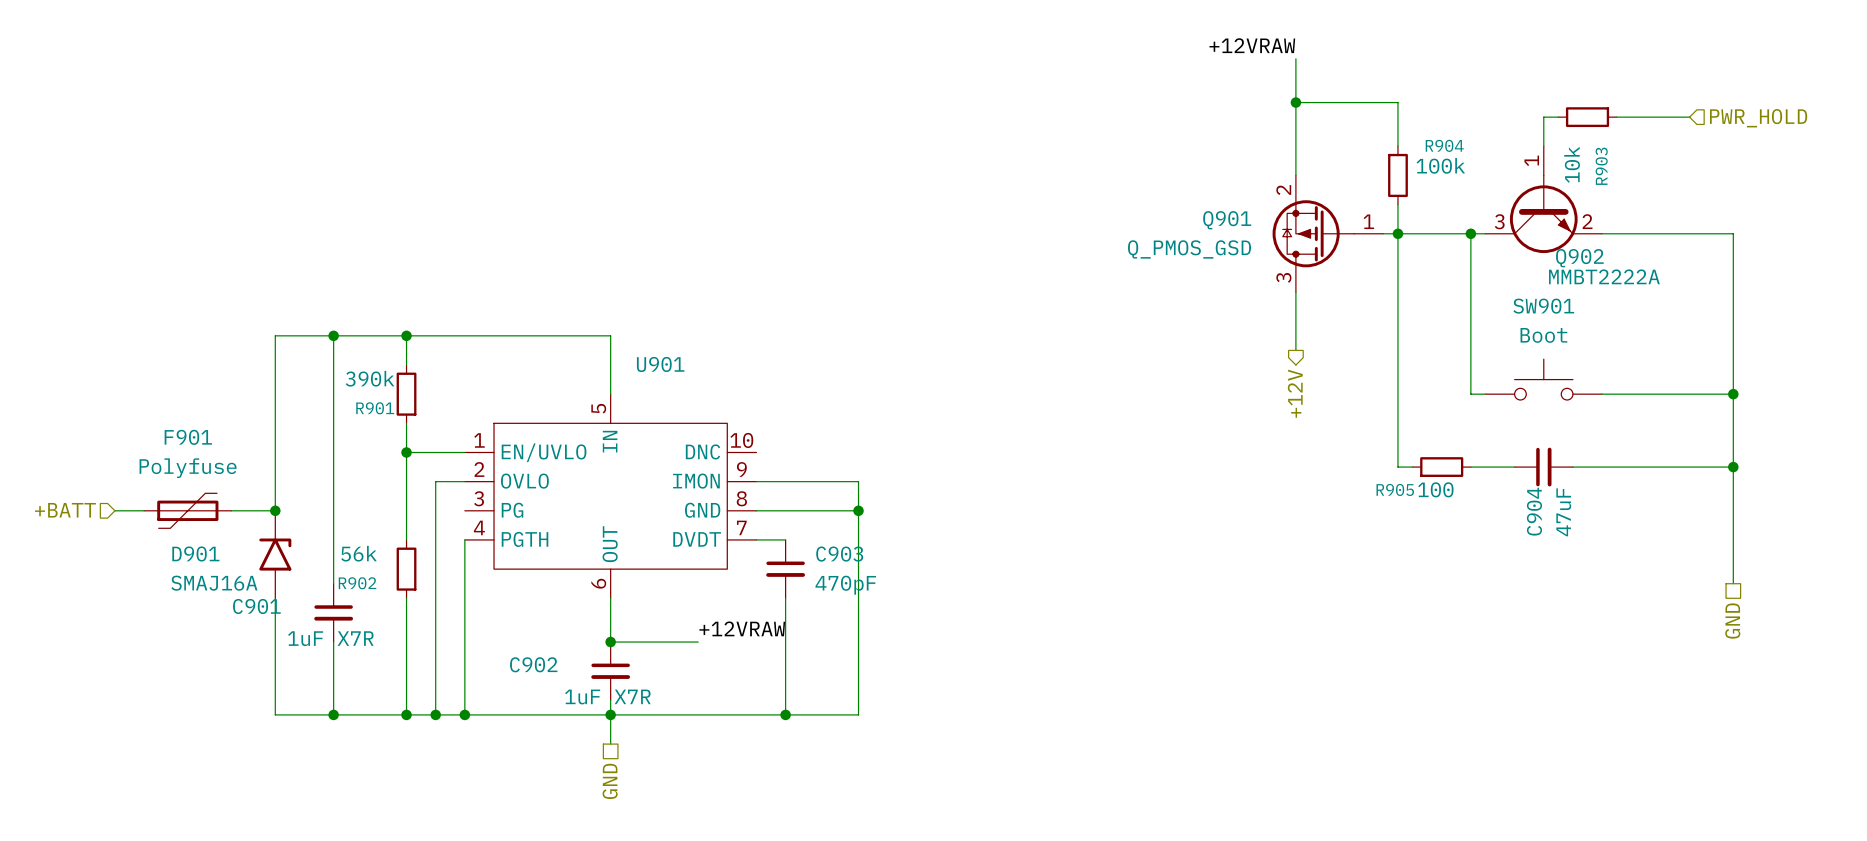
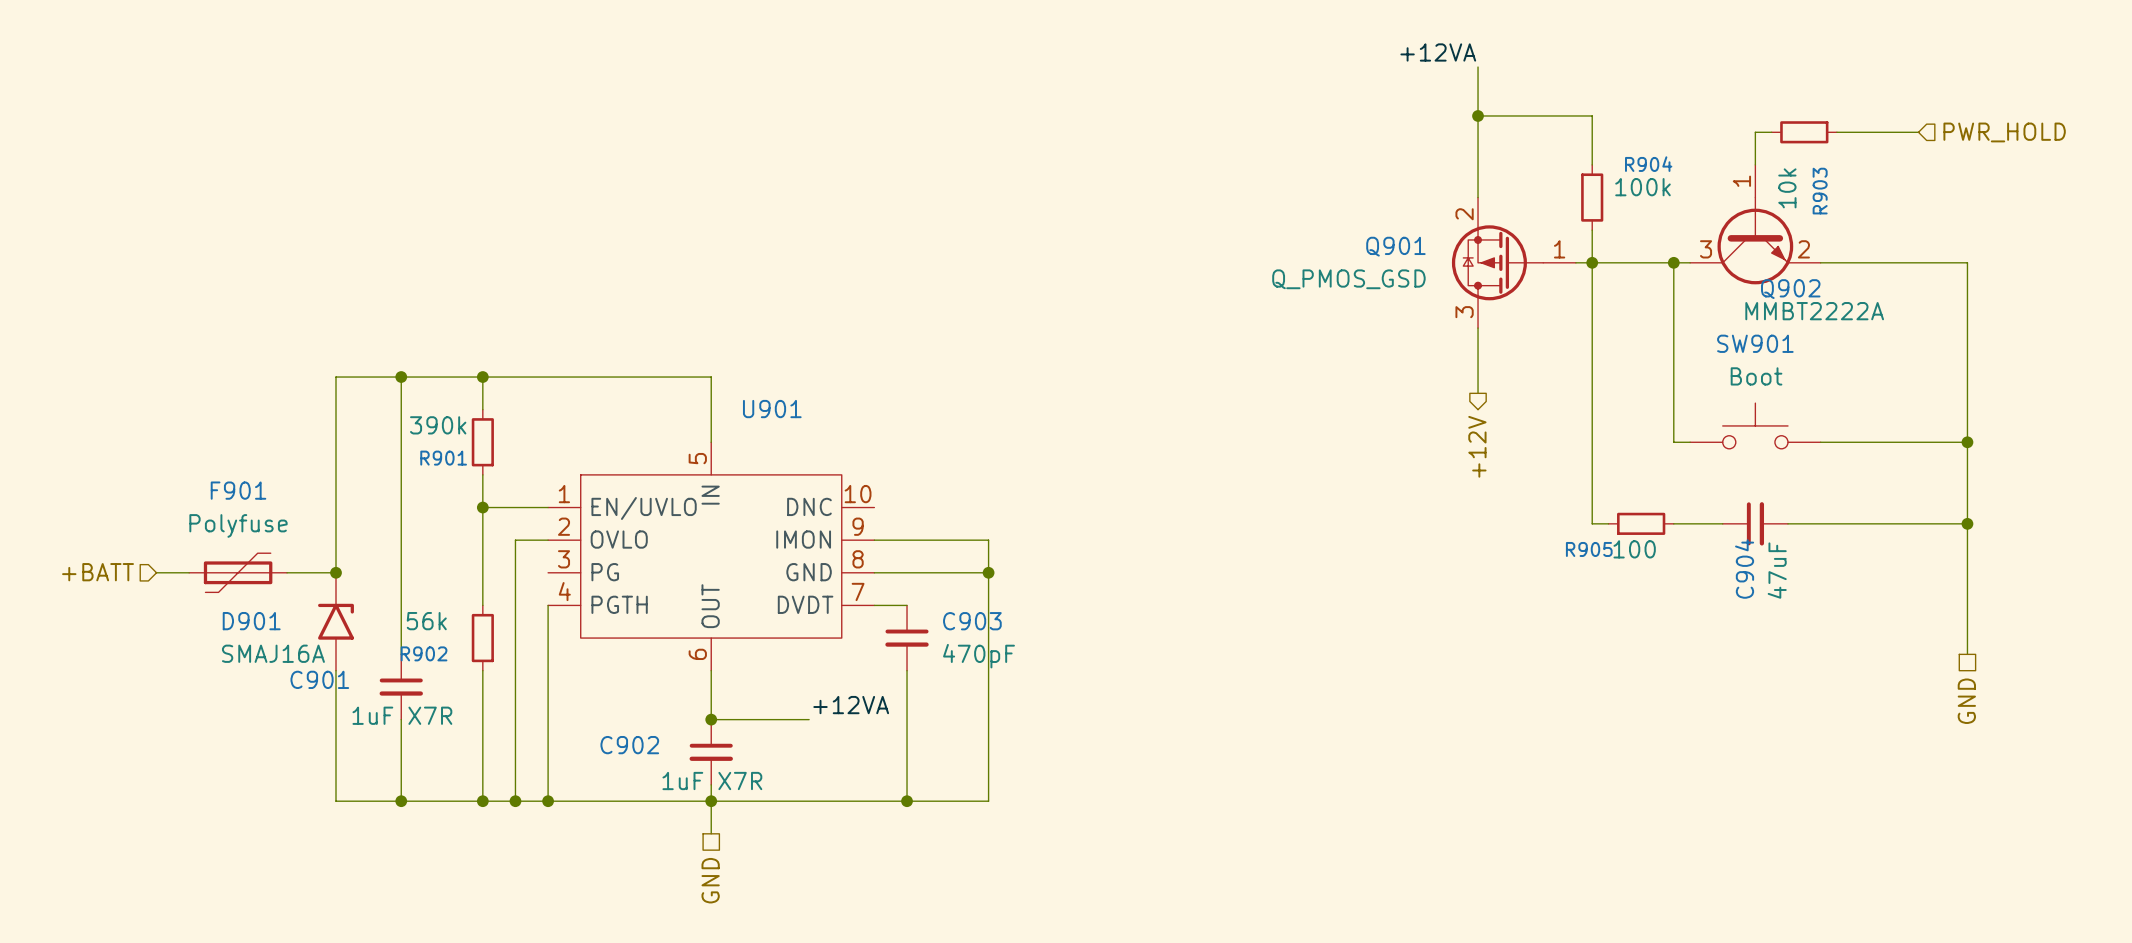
label: +12VRAW (1252, 45) -> +12VA (1438, 52)
label: +12VRAW (742, 628) -> +12VA (851, 705)

